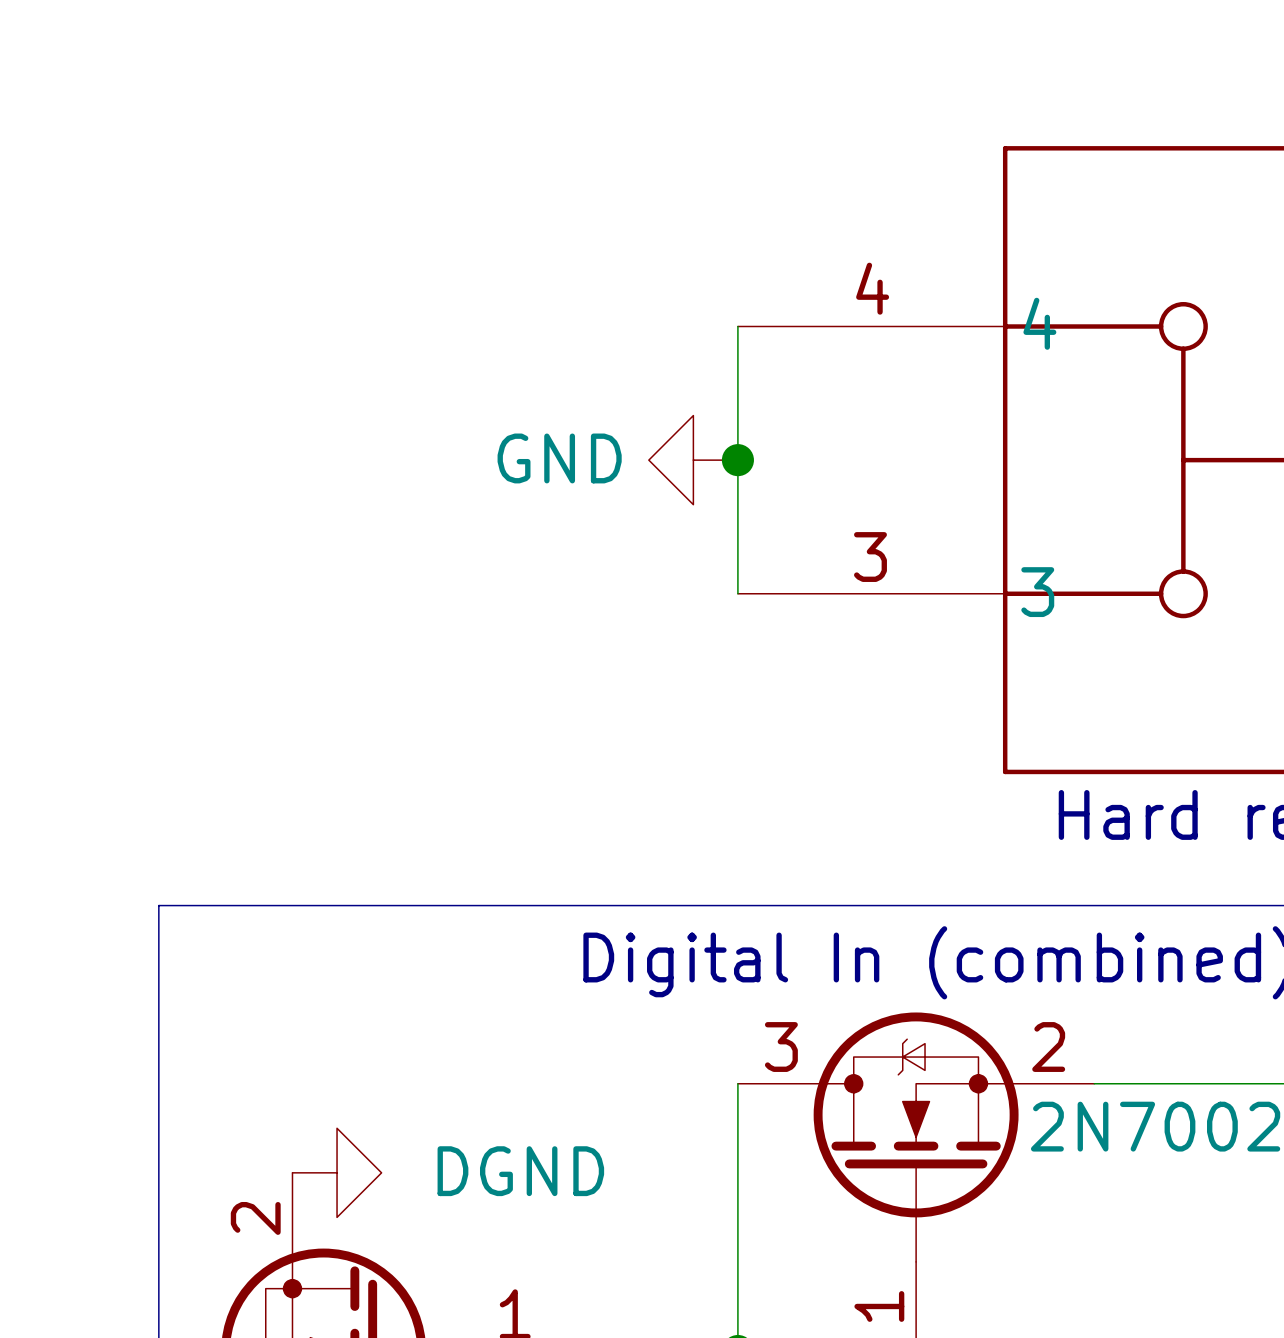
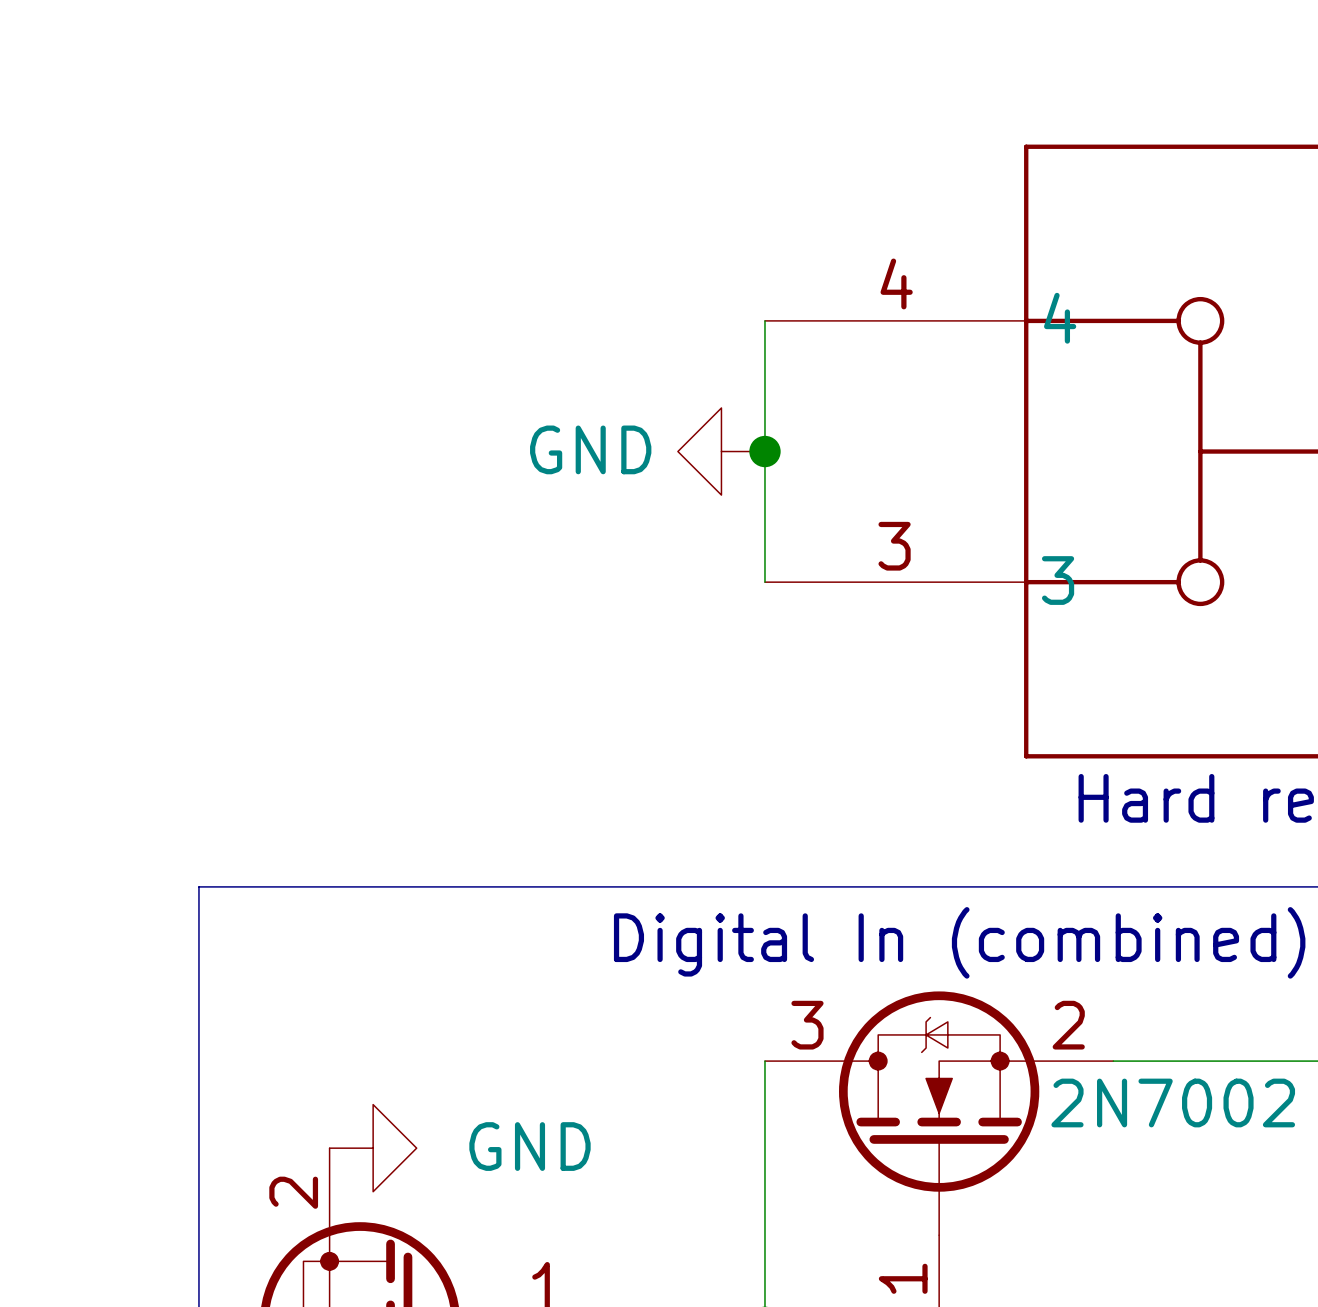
power symbol: DGND (337, 1172) -> GND (373, 1148)

